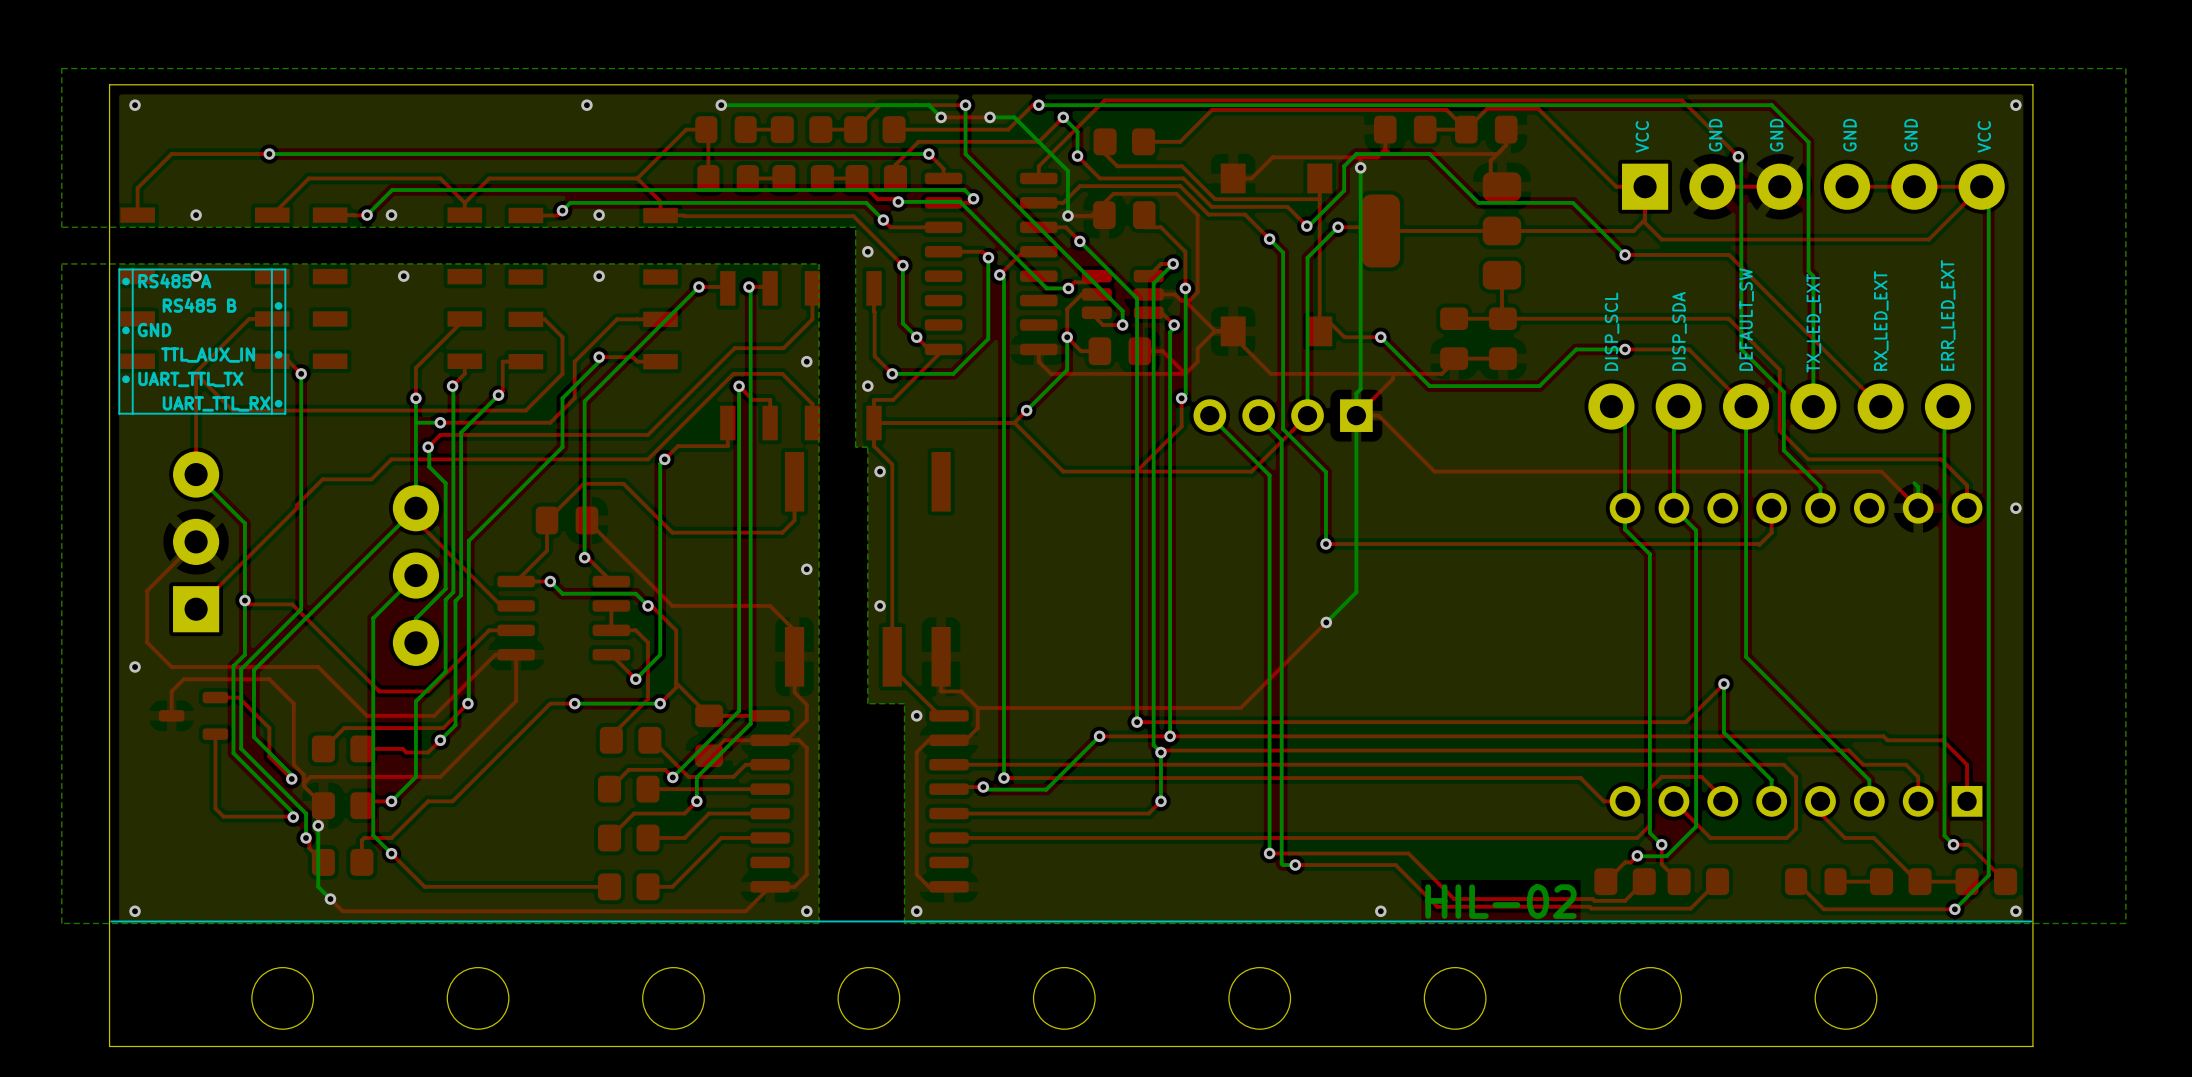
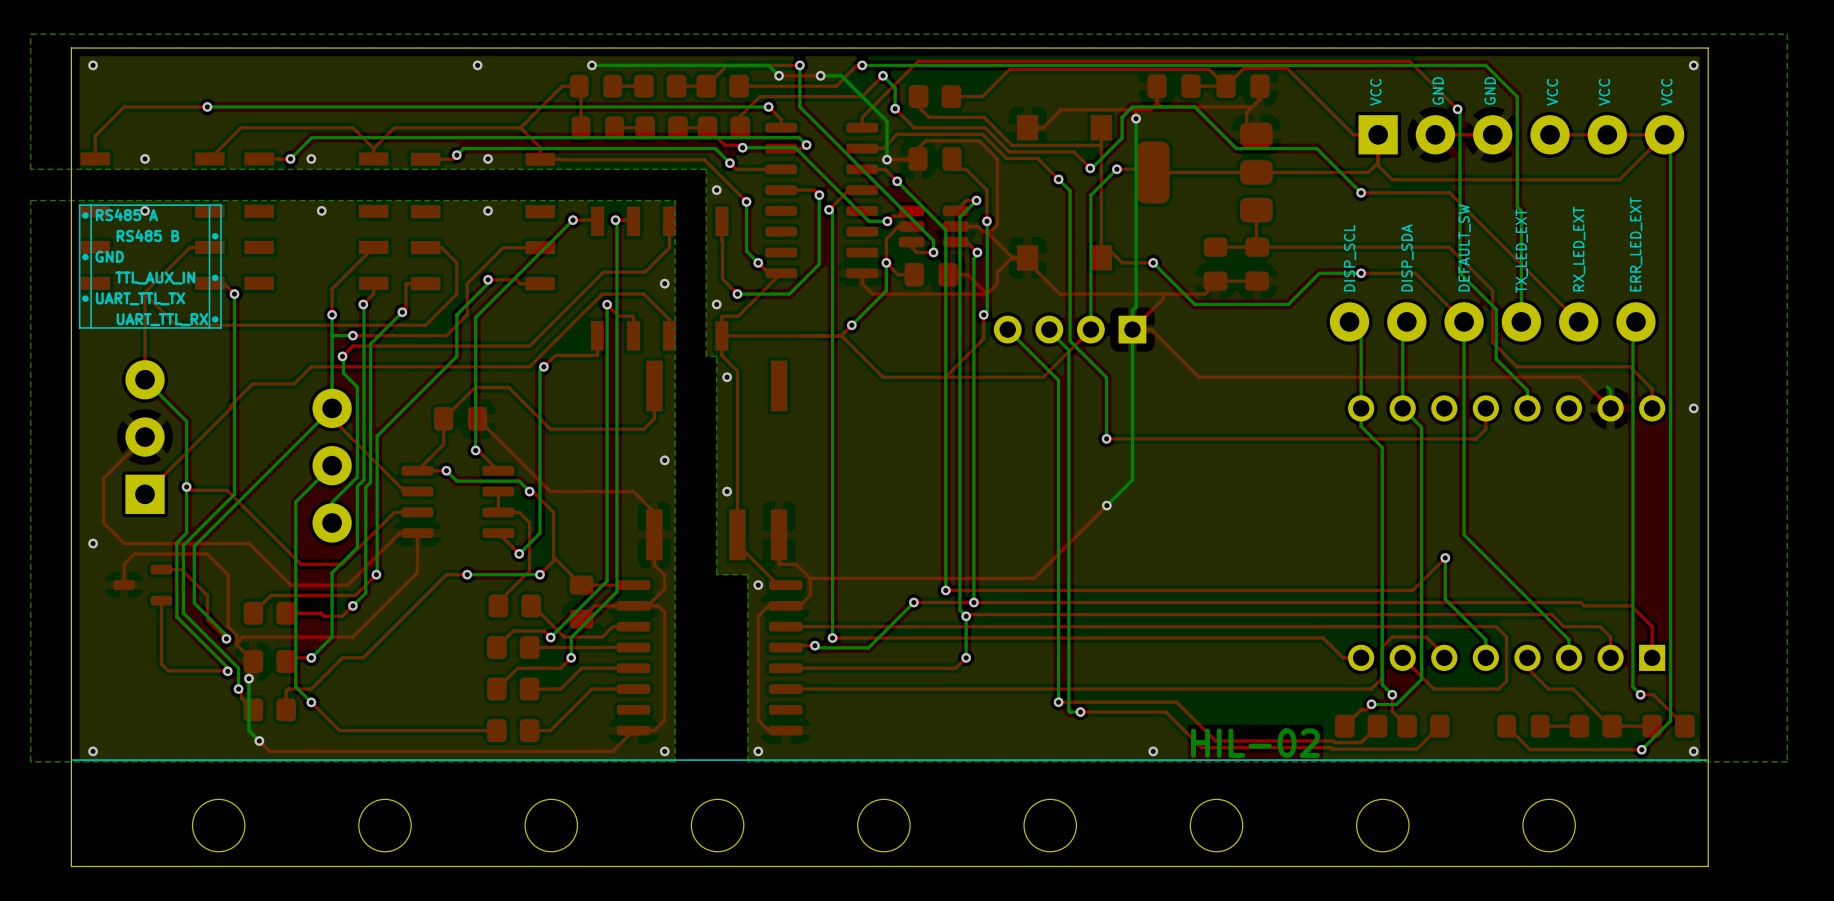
text: GND (1849, 135) -> VCC (1552, 92)
text: GND (1911, 135) -> VCC (1604, 92)

